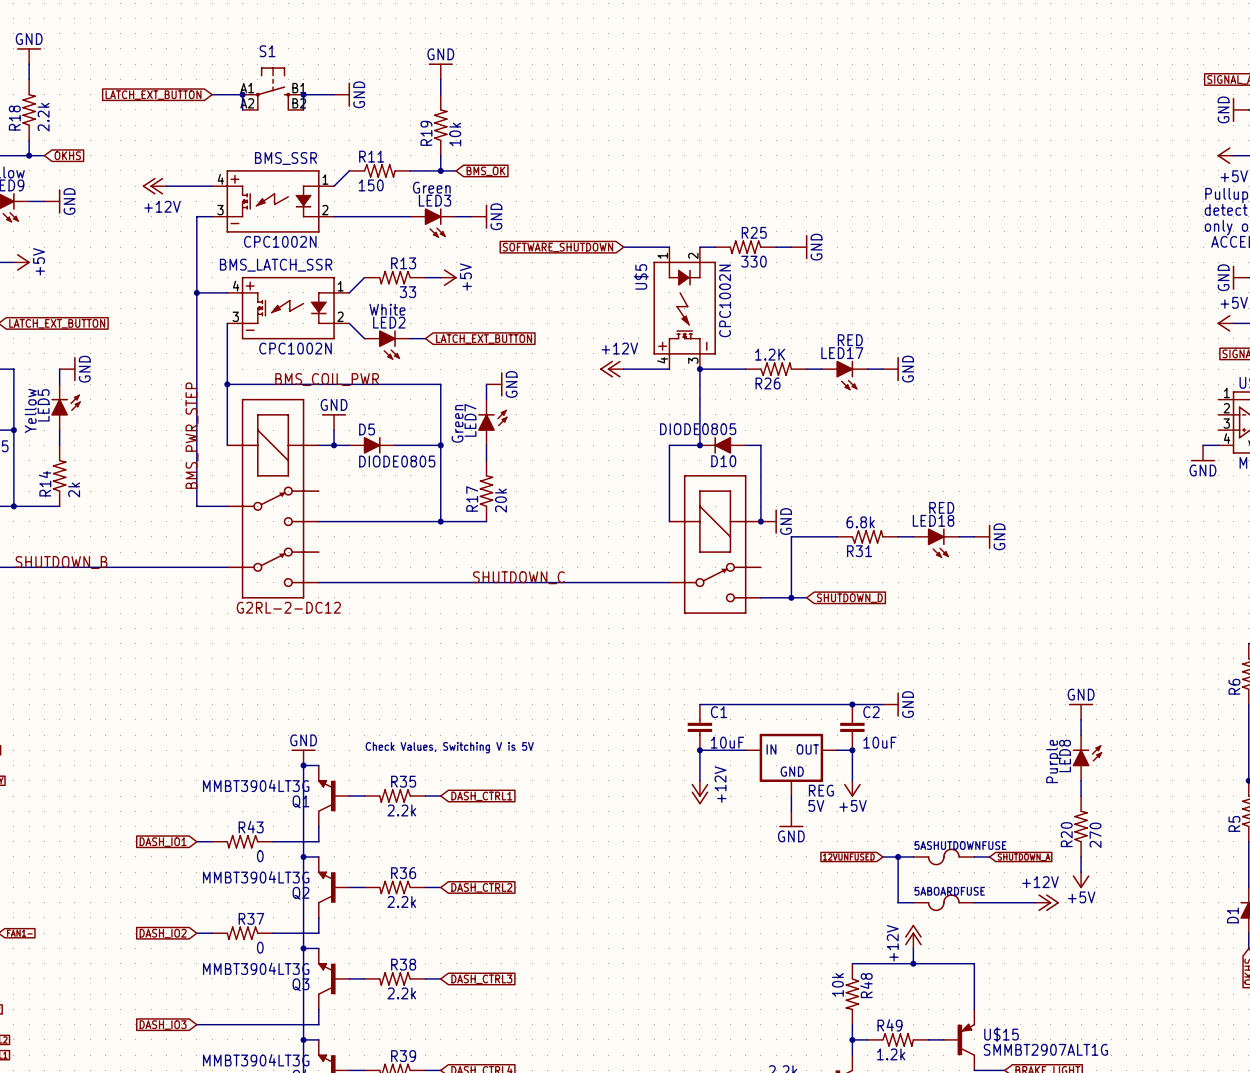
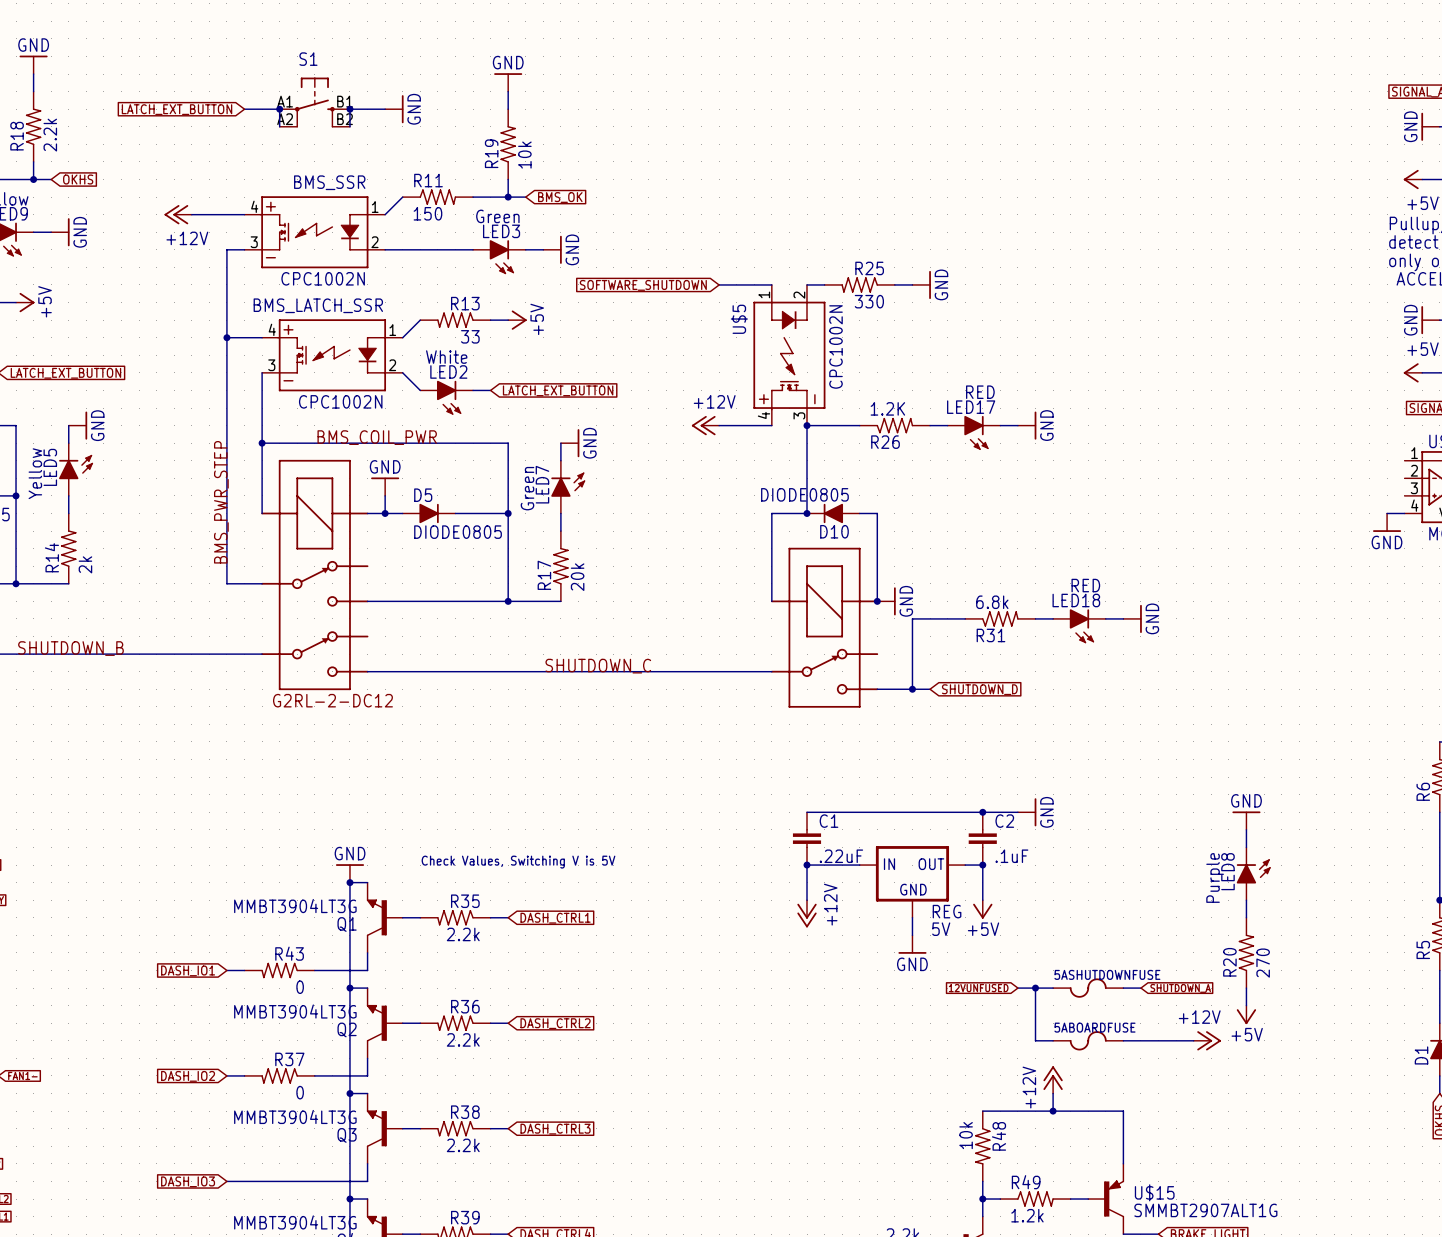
C1 value: 10uF (727, 742) -> .22uF (841, 856)
C2 value: 10uF (879, 742) -> .1uF (1011, 856)

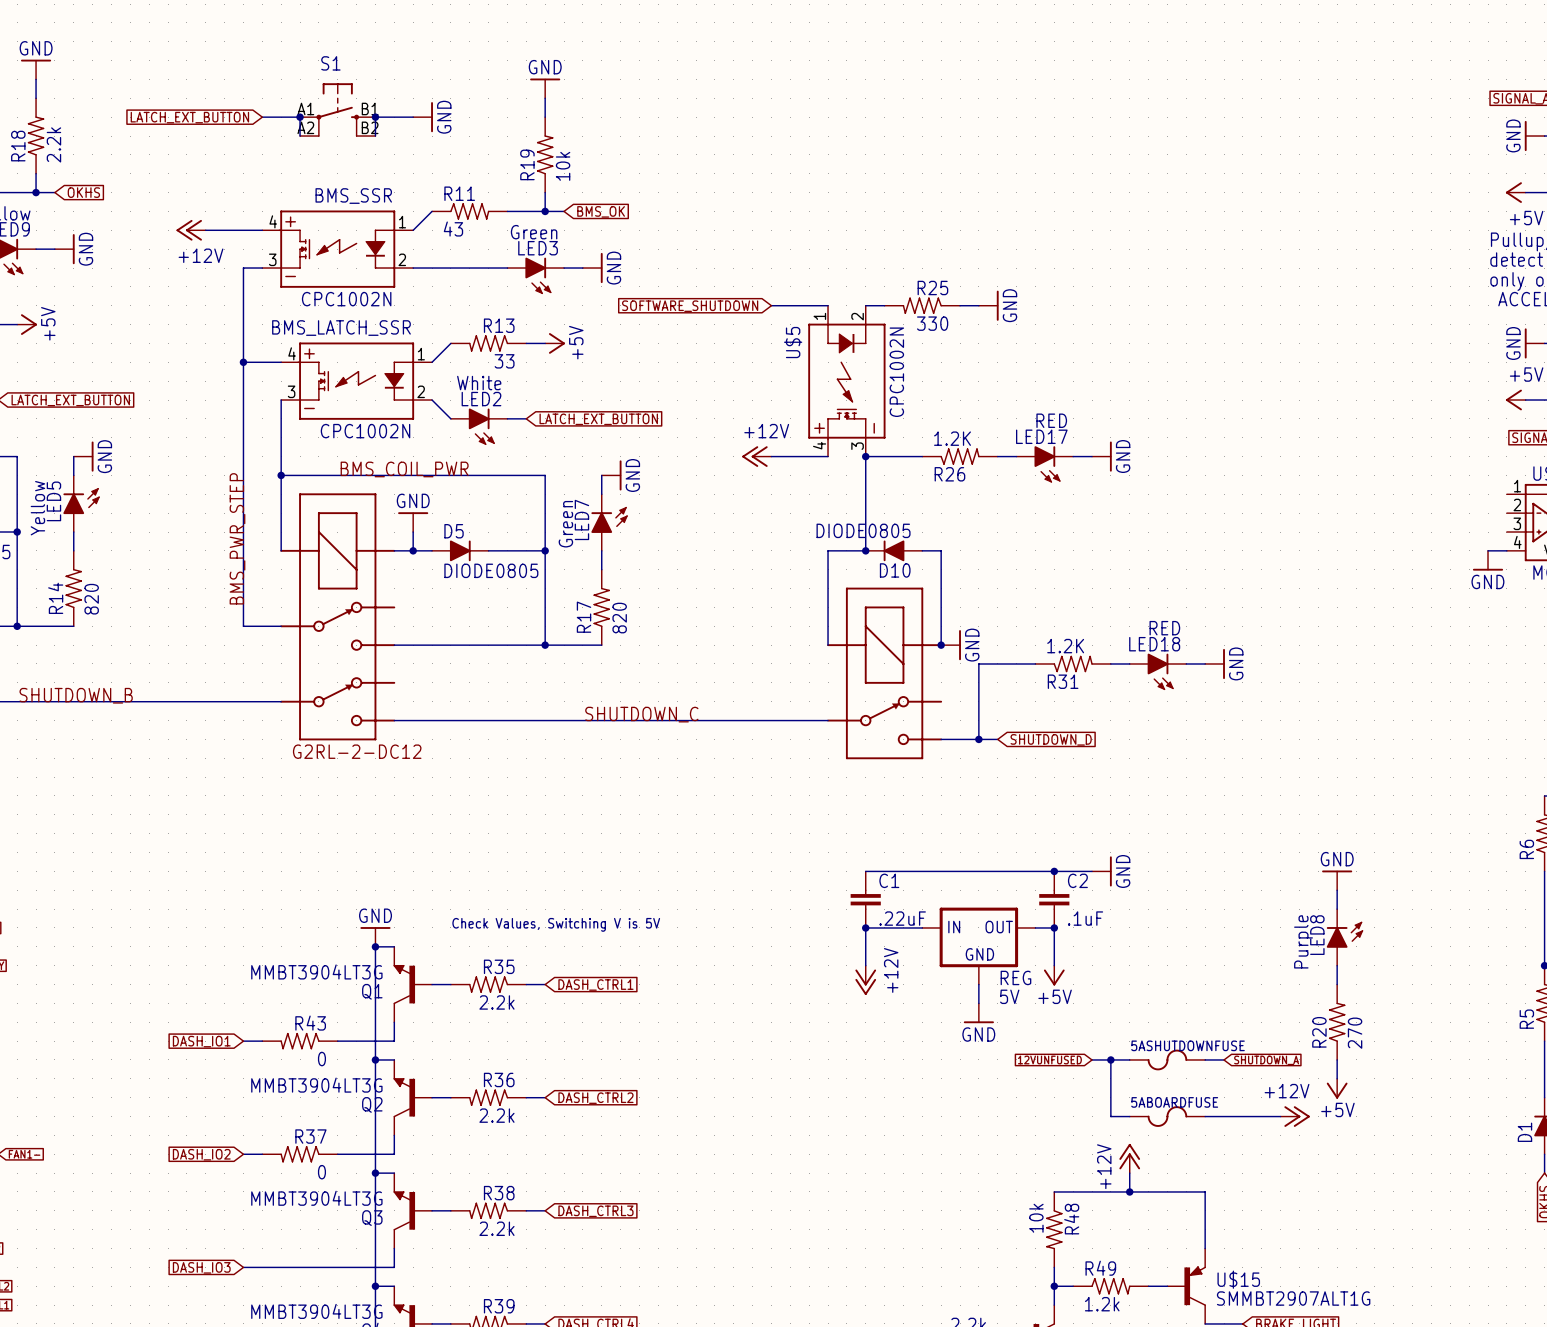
R11 value: 150 (427, 213) -> 43 (453, 229)
R14 value: 2k (85, 564) -> 820 (91, 599)
R17 value: 20k (577, 577) -> 820 (619, 618)
R31 value: 6.8k (992, 602) -> 1.2K (1065, 646)

